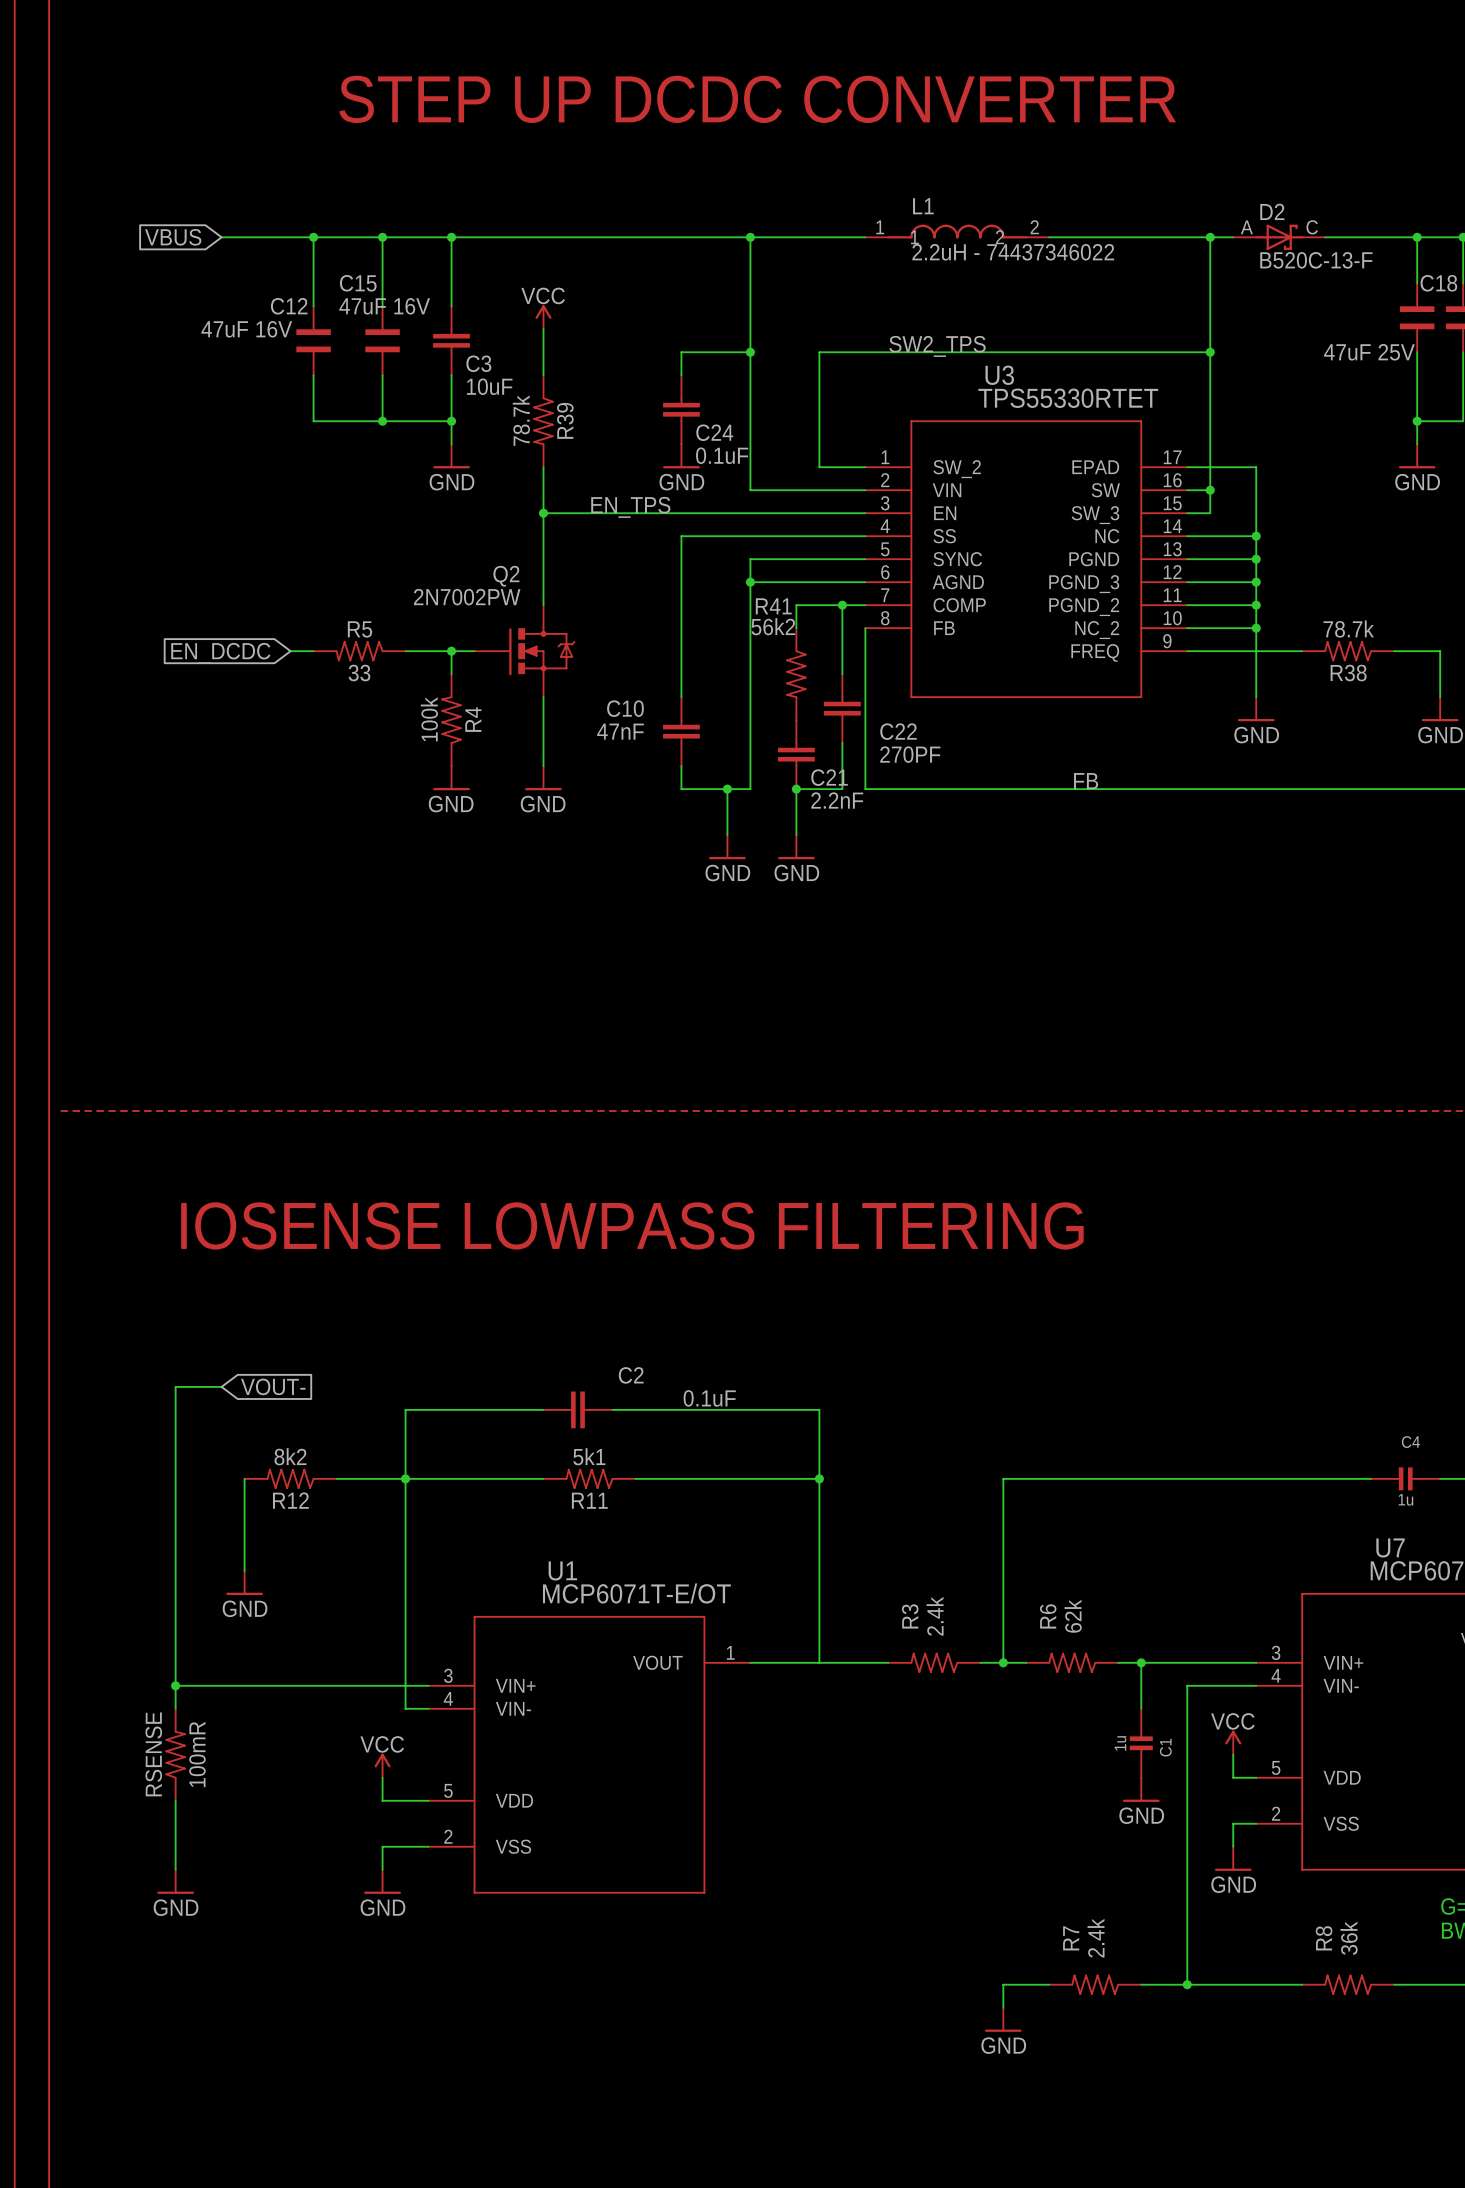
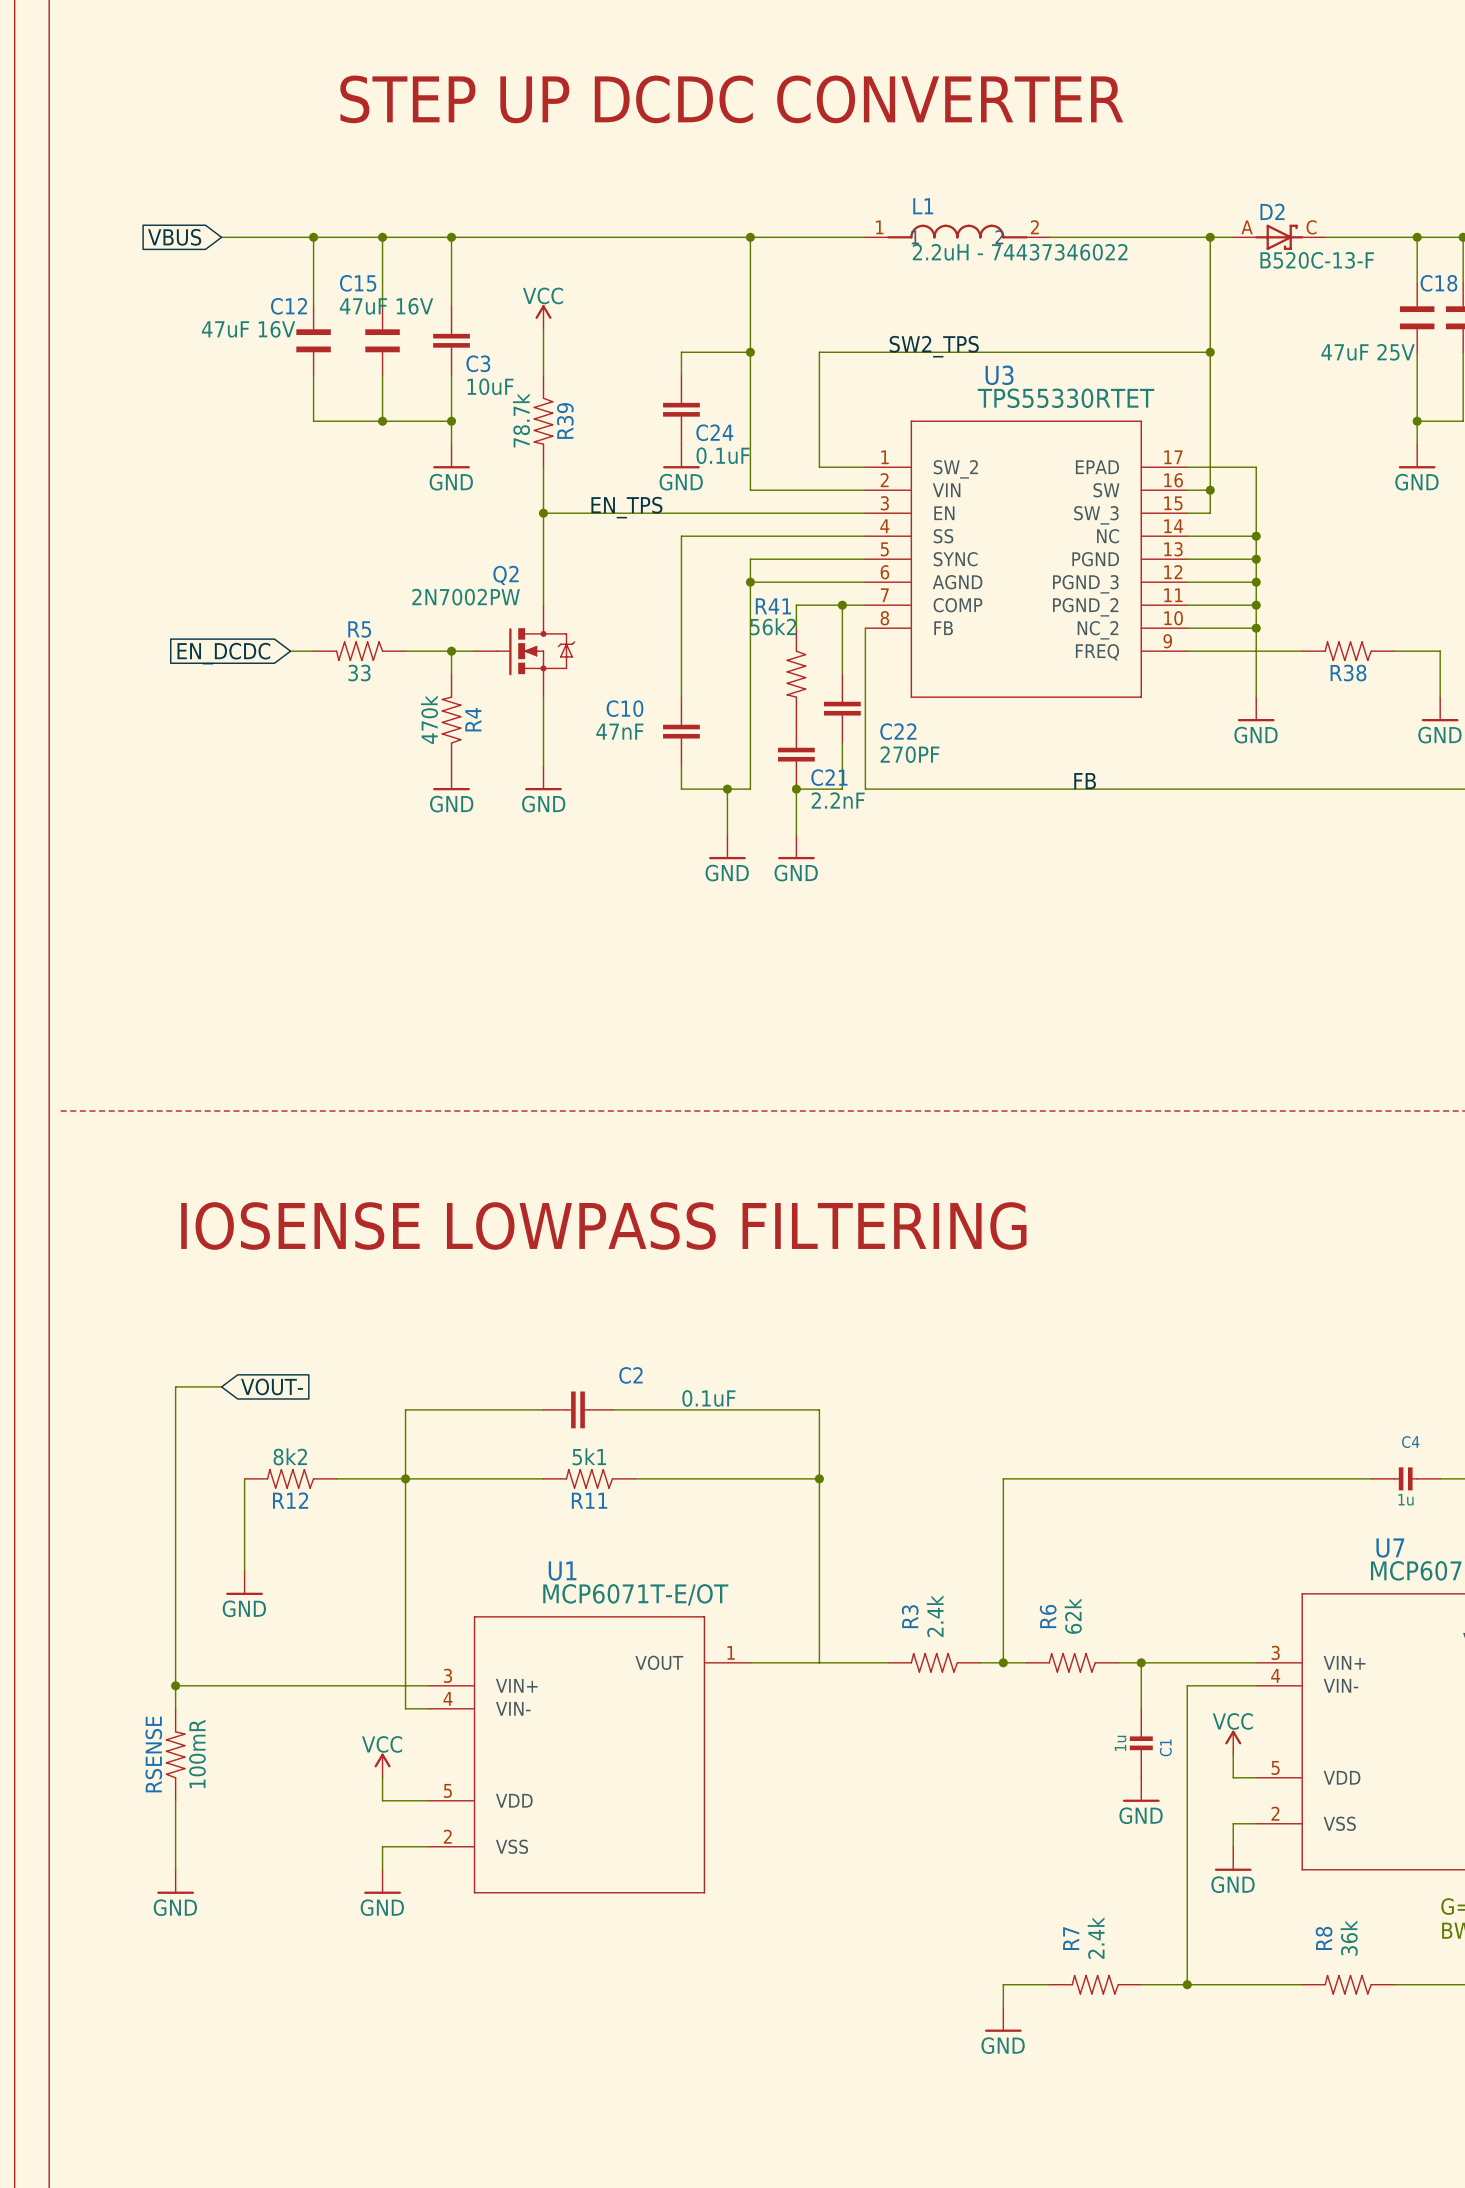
R38 value: 78.7k (1348, 629) -> none
R4 value: 100k (429, 719) -> 470k (429, 719)

